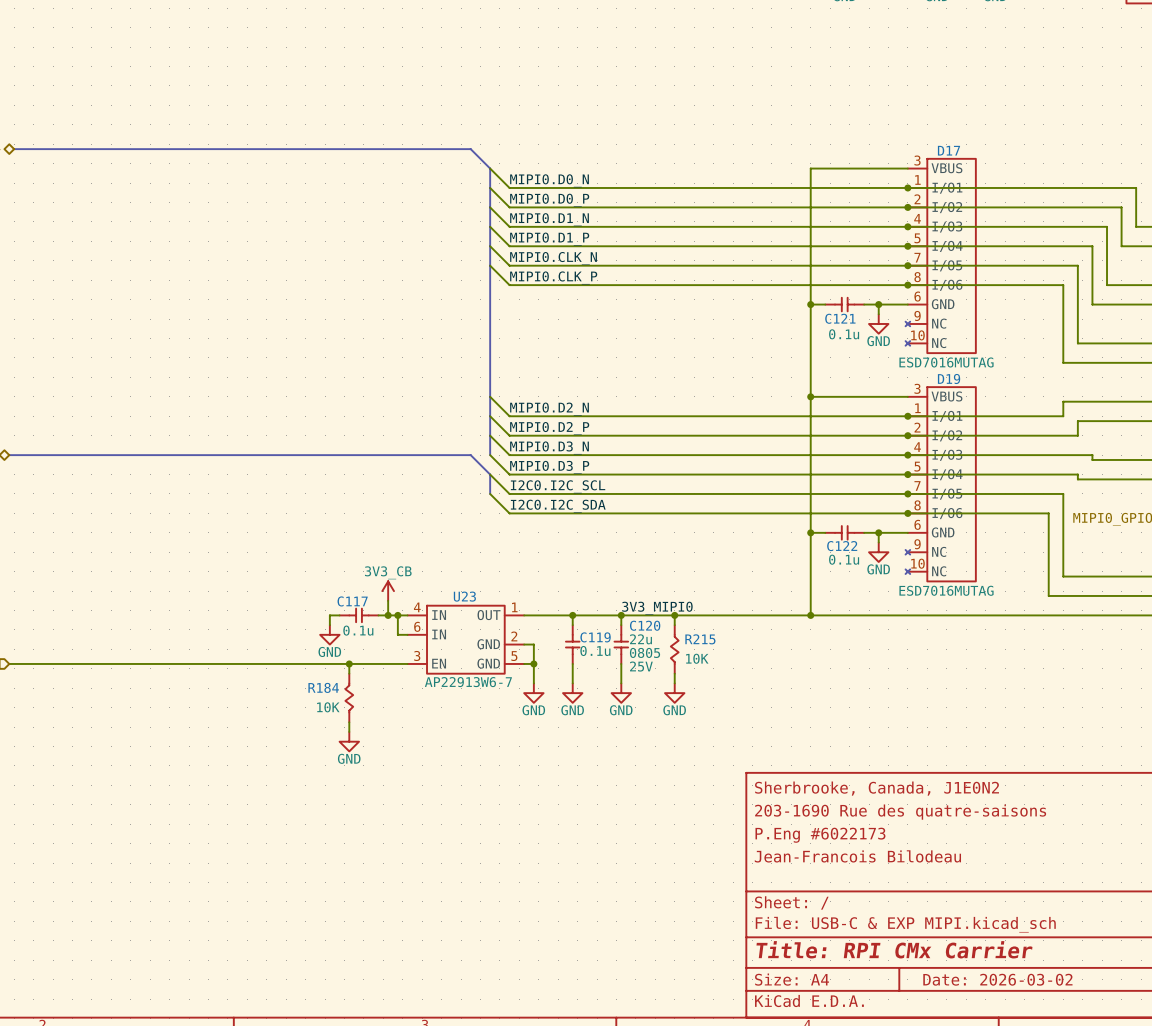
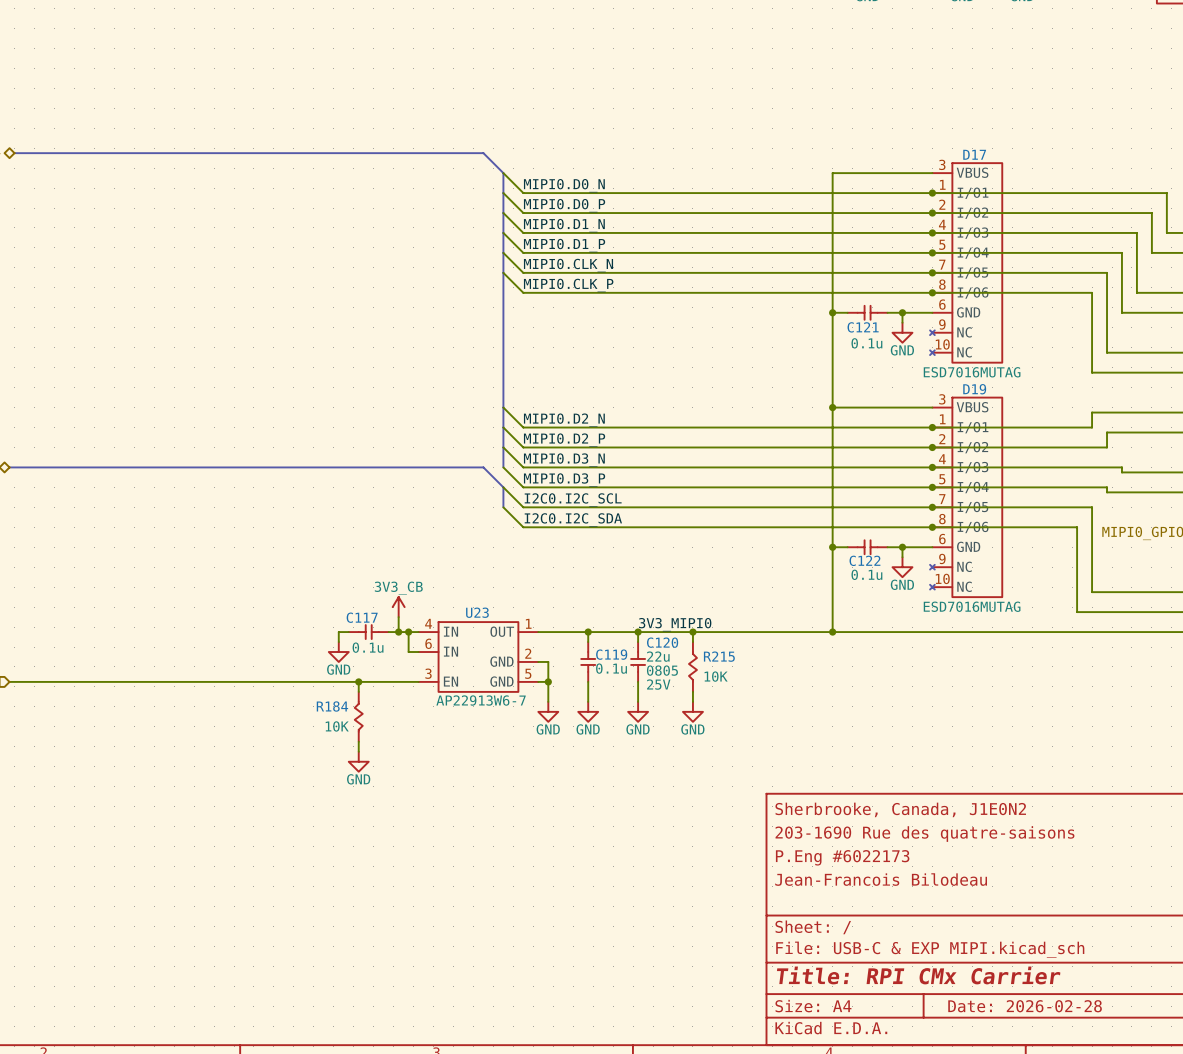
title block: Date: 2026-03-02 (997, 979) -> Date: 2026-02-28 (1025, 1006)

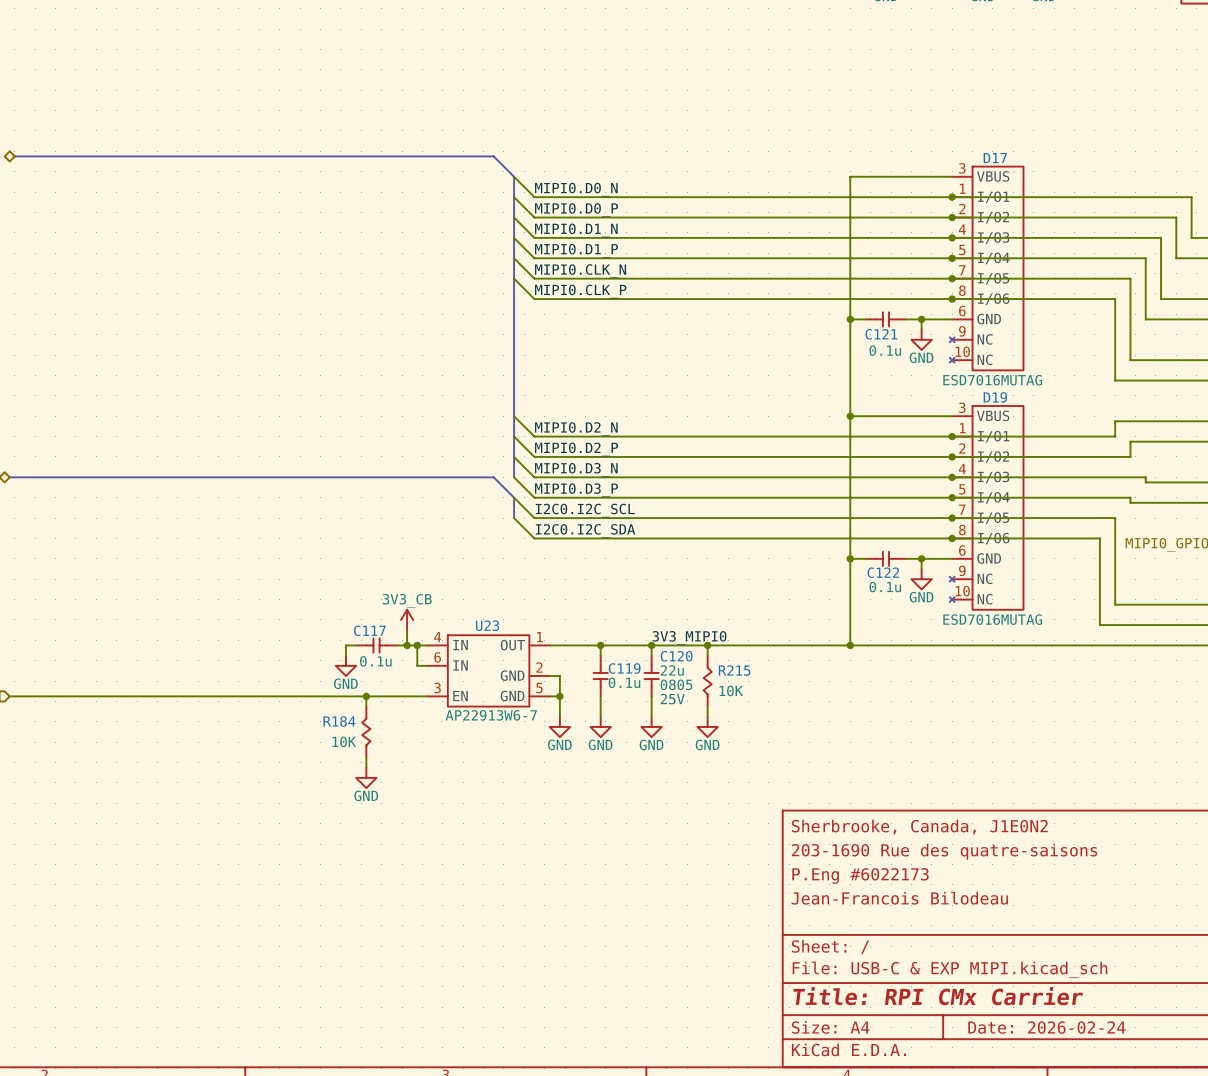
title block: Date: 2026-02-28 (1025, 1006) -> Date: 2026-02-24 (1046, 1027)

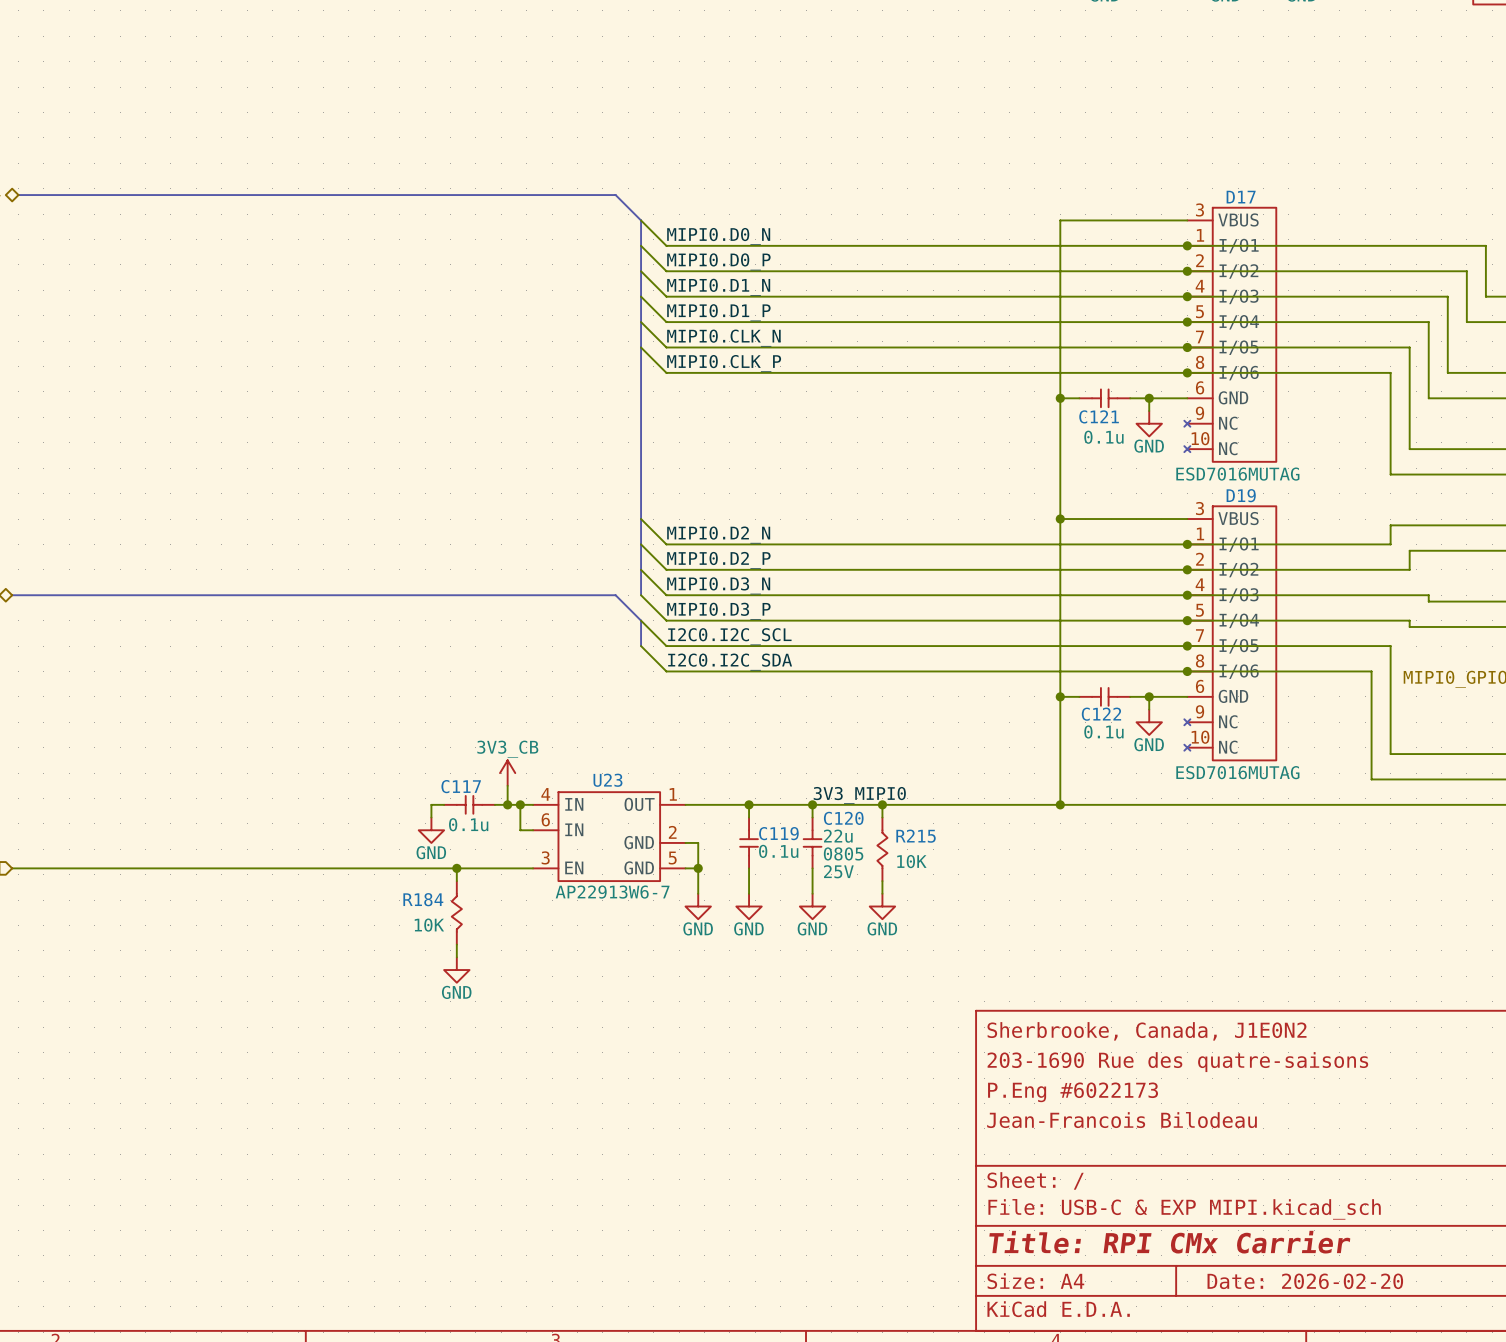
title block: Date: 2026-02-24 (1046, 1027) -> Date: 2026-02-20 (1305, 1281)

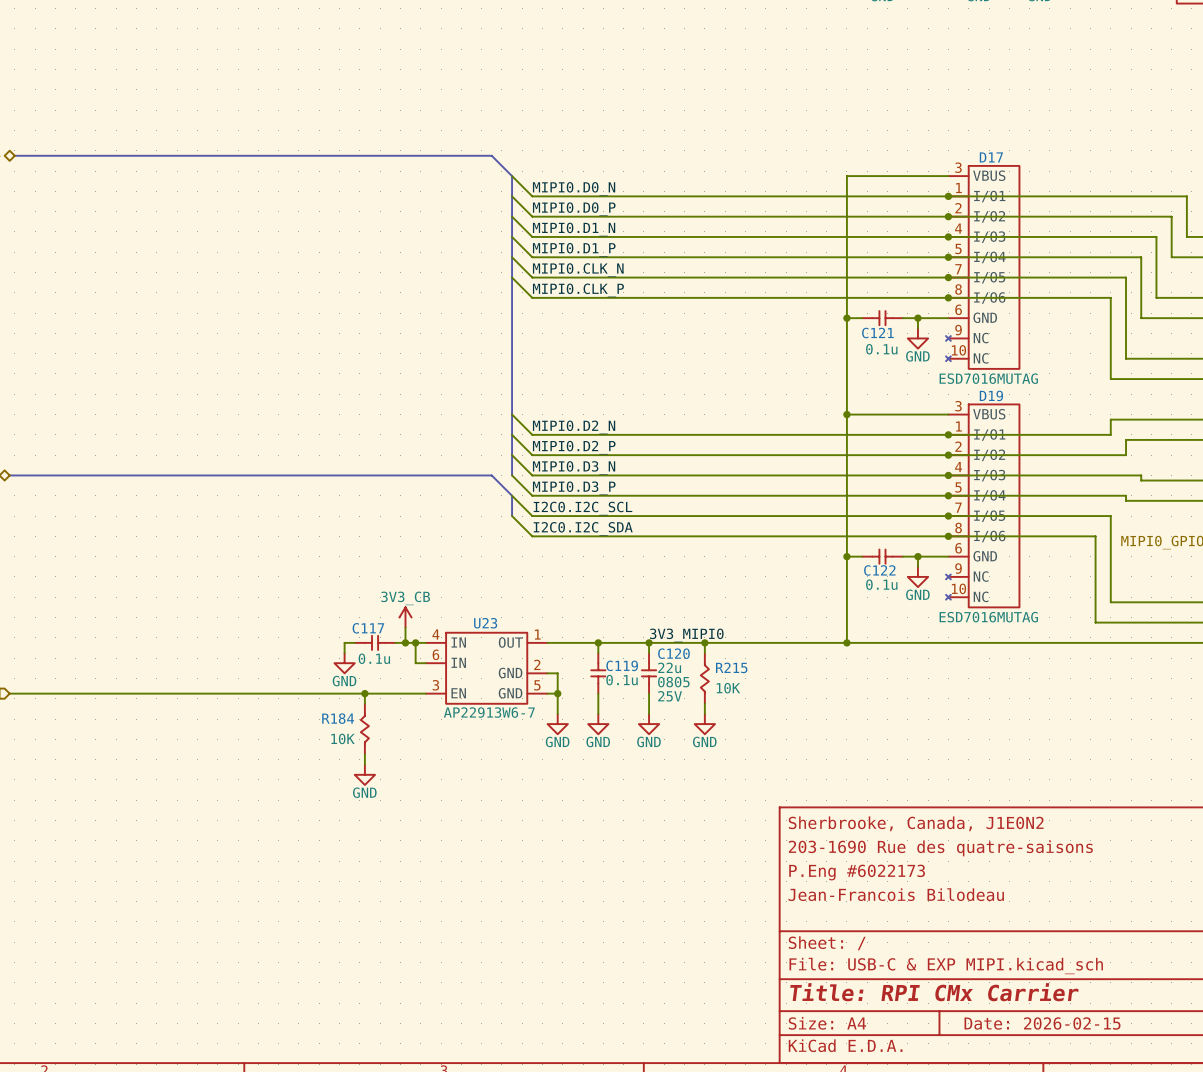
title block: Date: 2026-02-20 (1305, 1281) -> Date: 2026-02-15 (1042, 1023)

